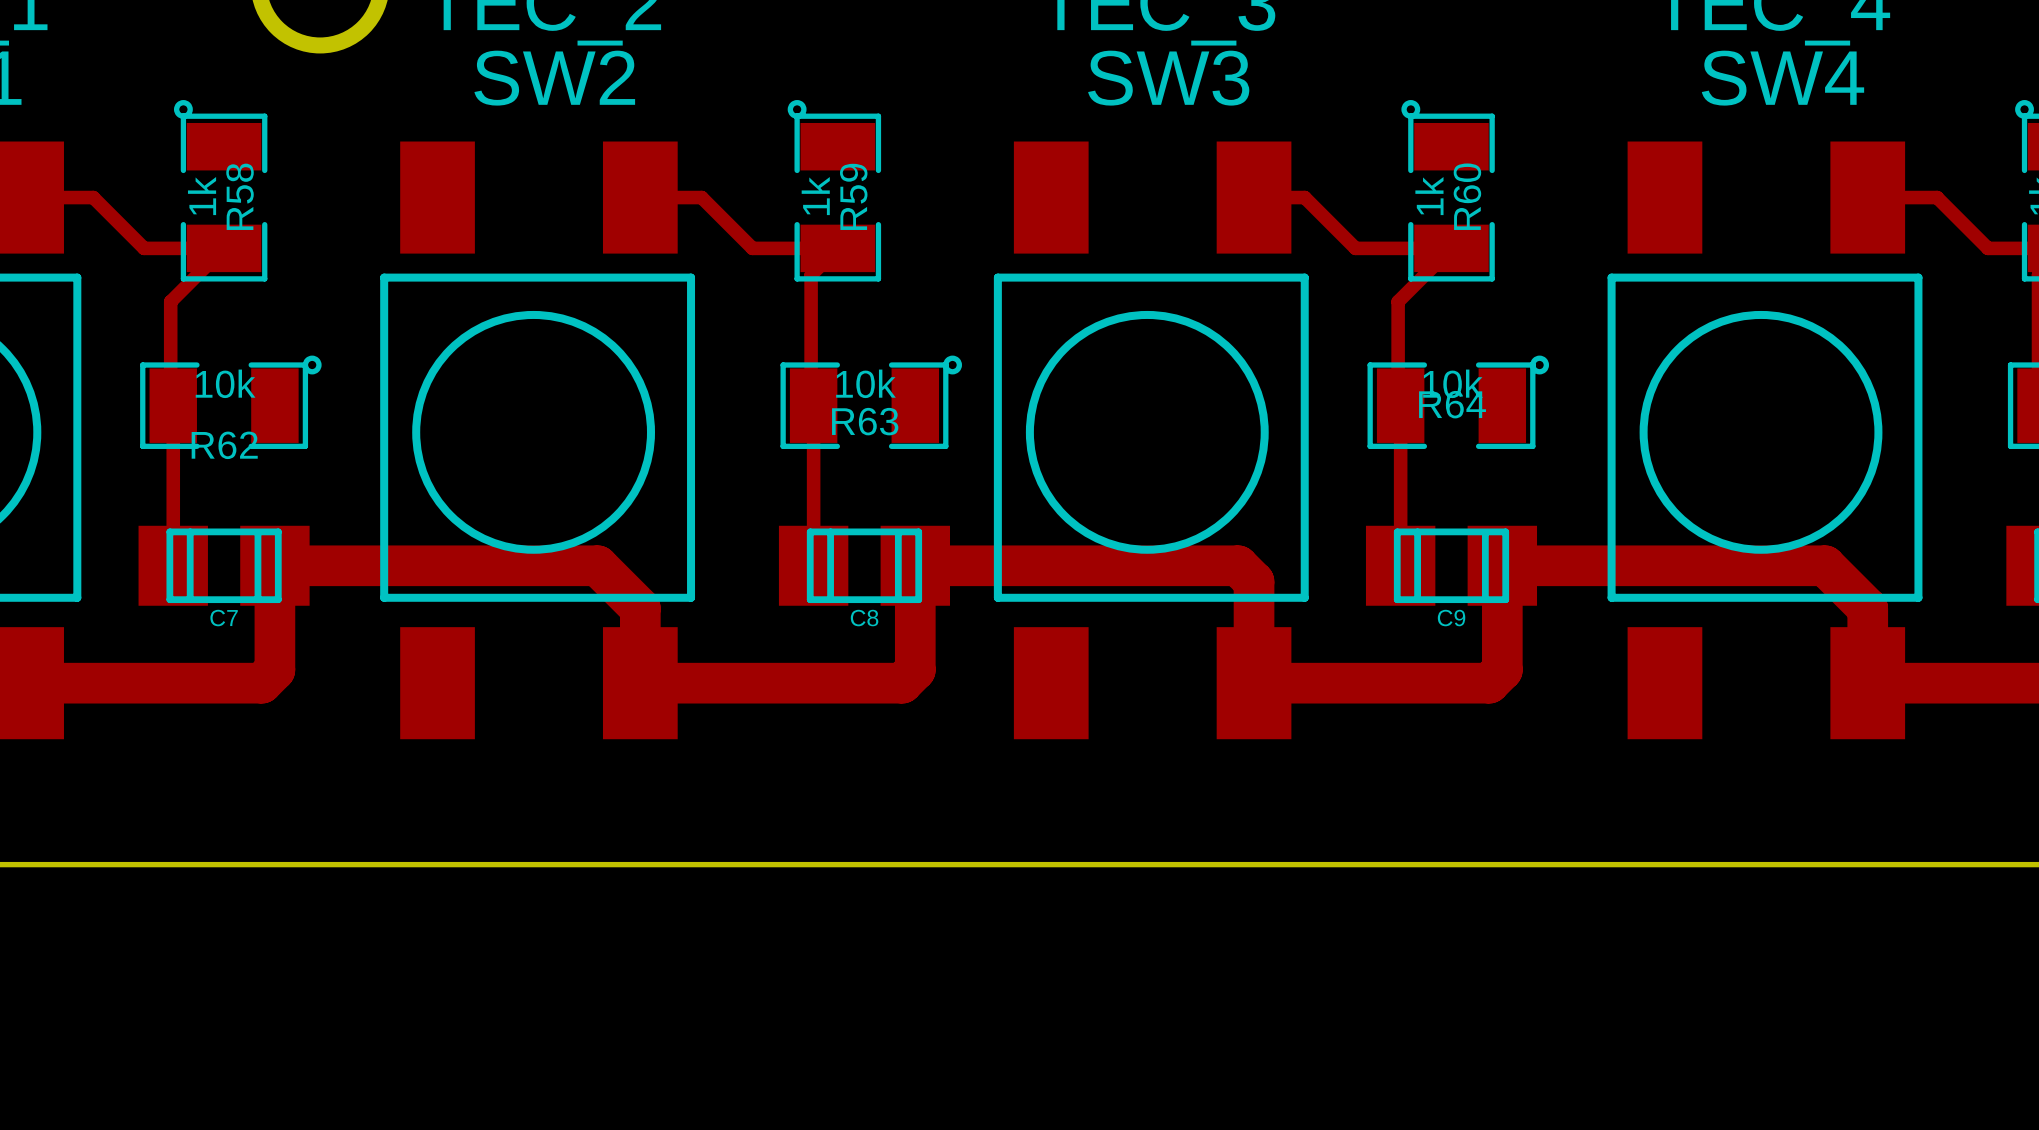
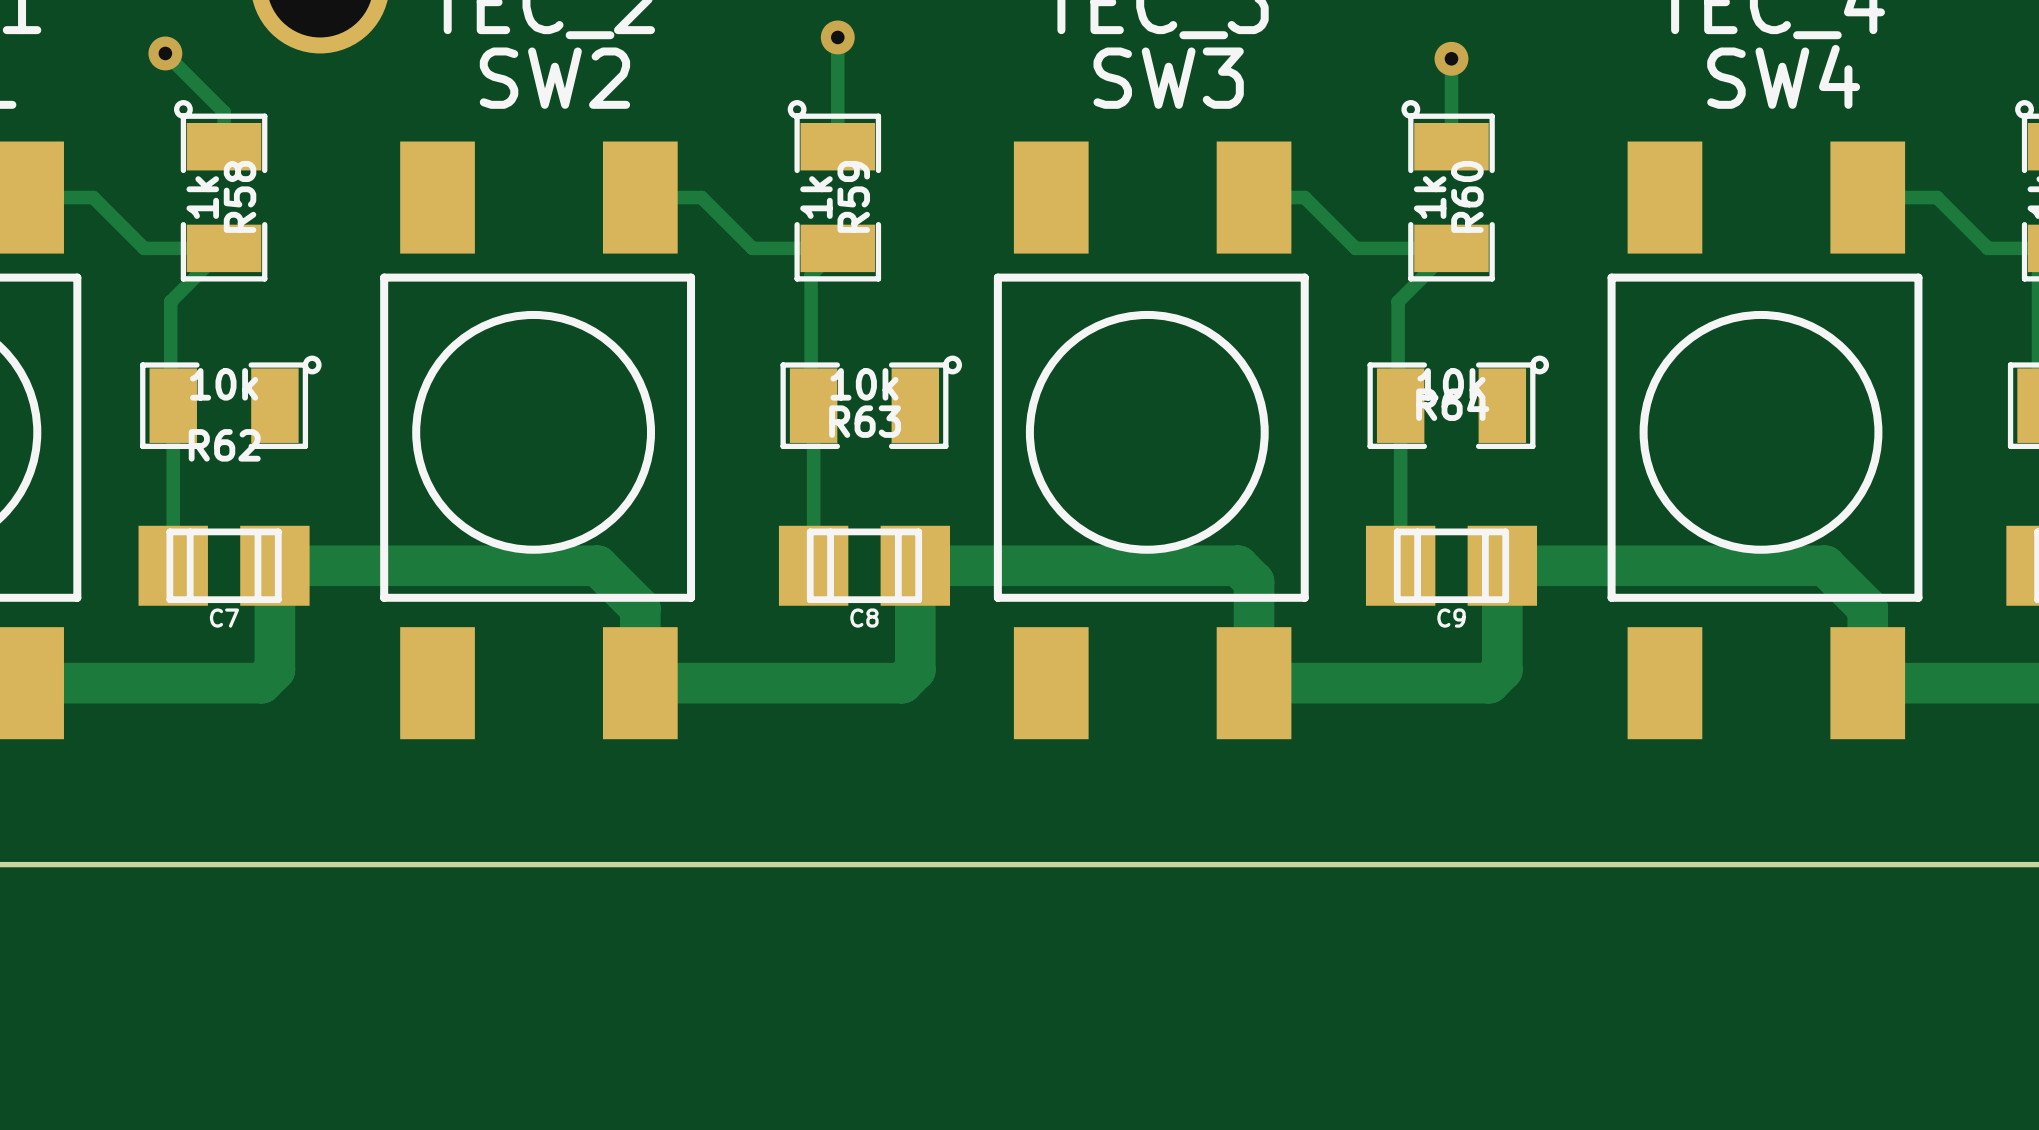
track: none -> (837, 37) (837, 146)
via: none -> (837, 37)
track: none -> (165, 53) (224, 112) (224, 146)
via: none -> (165, 53)
track: none -> (1451, 58) (1451, 146)
via: none -> (1451, 58)

